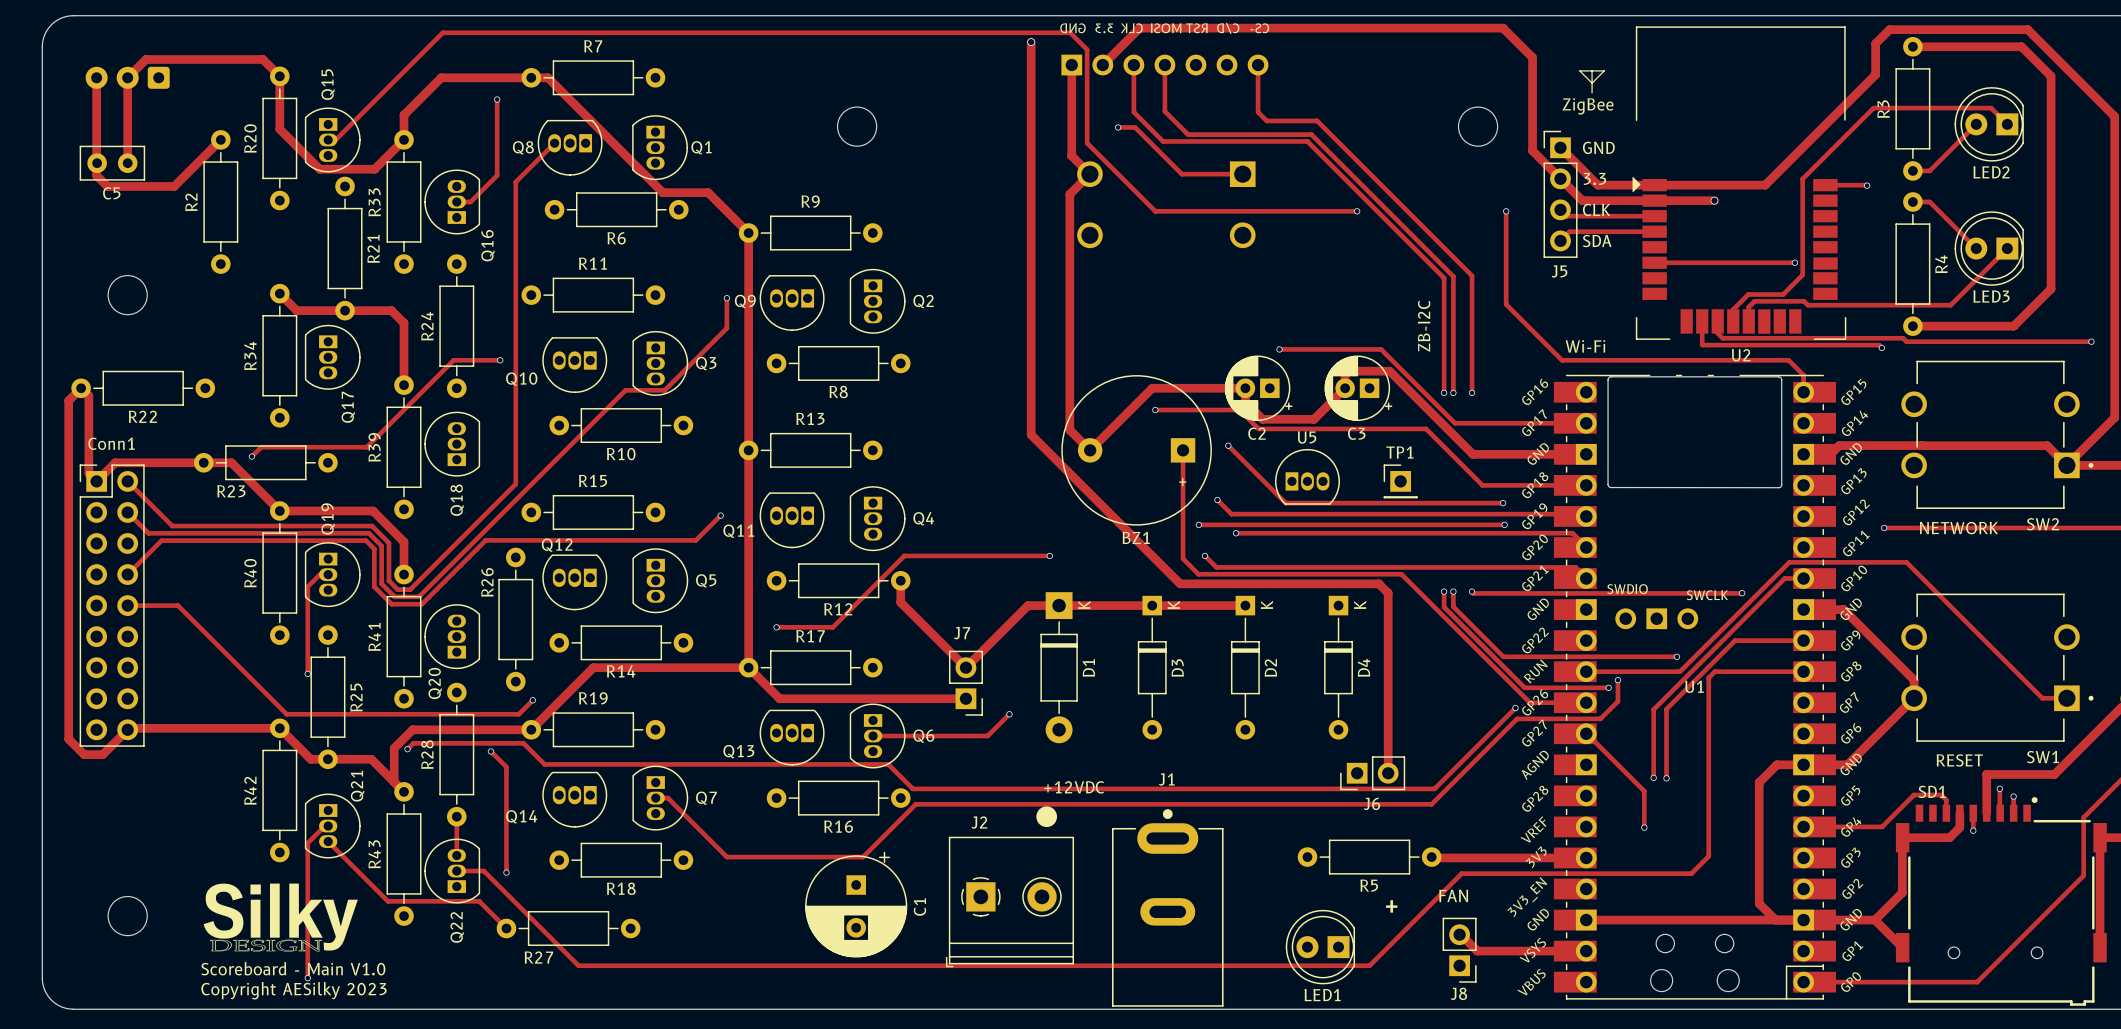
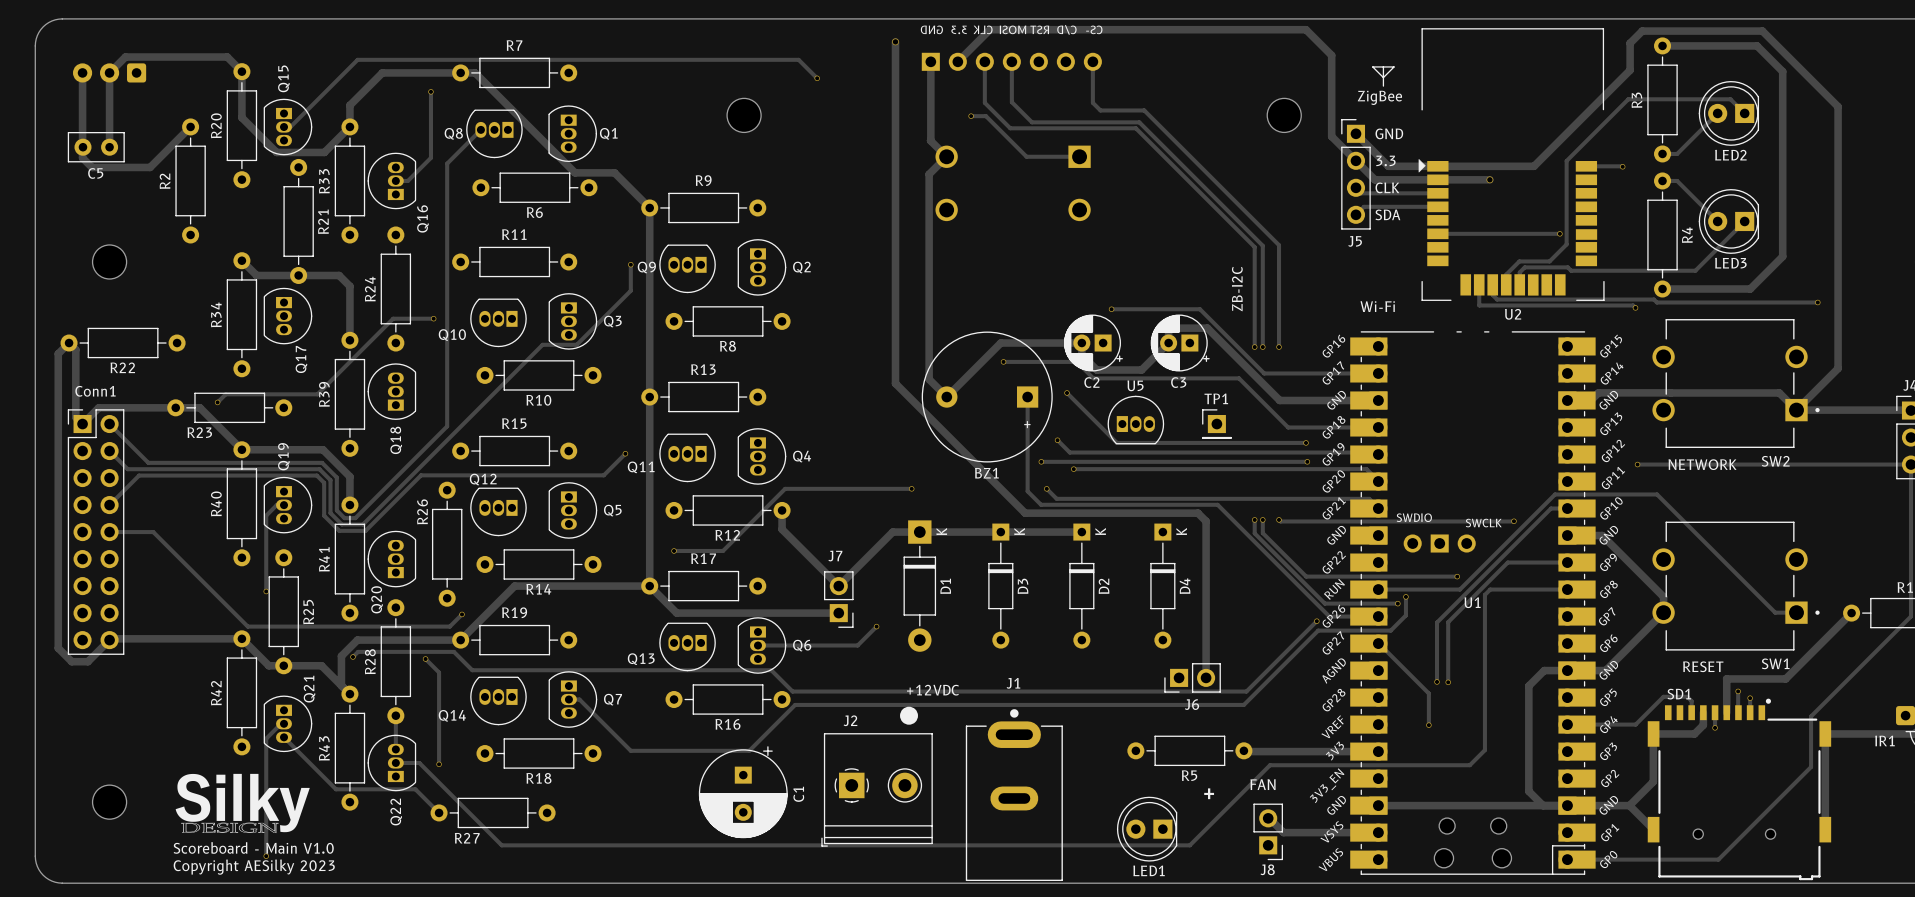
track: (412, 62) (442, 32) (1070, 32) (1087, 49) (1087, 143) (1155, 211) (1357, 211) -> (357, 59) (798, 59) (817, 78)
via: none -> (817, 78)
via: (1357, 211) -> none
track: (1506, 211) (1506, 304) (1562, 360) (1788, 360) (1803, 375) (1803, 392) -> none
via: (1506, 211) -> none
board edge: (1611, 376) (1780, 377) (1781, 486) (1609, 487) (1608, 379) (1611, 376) -> none

